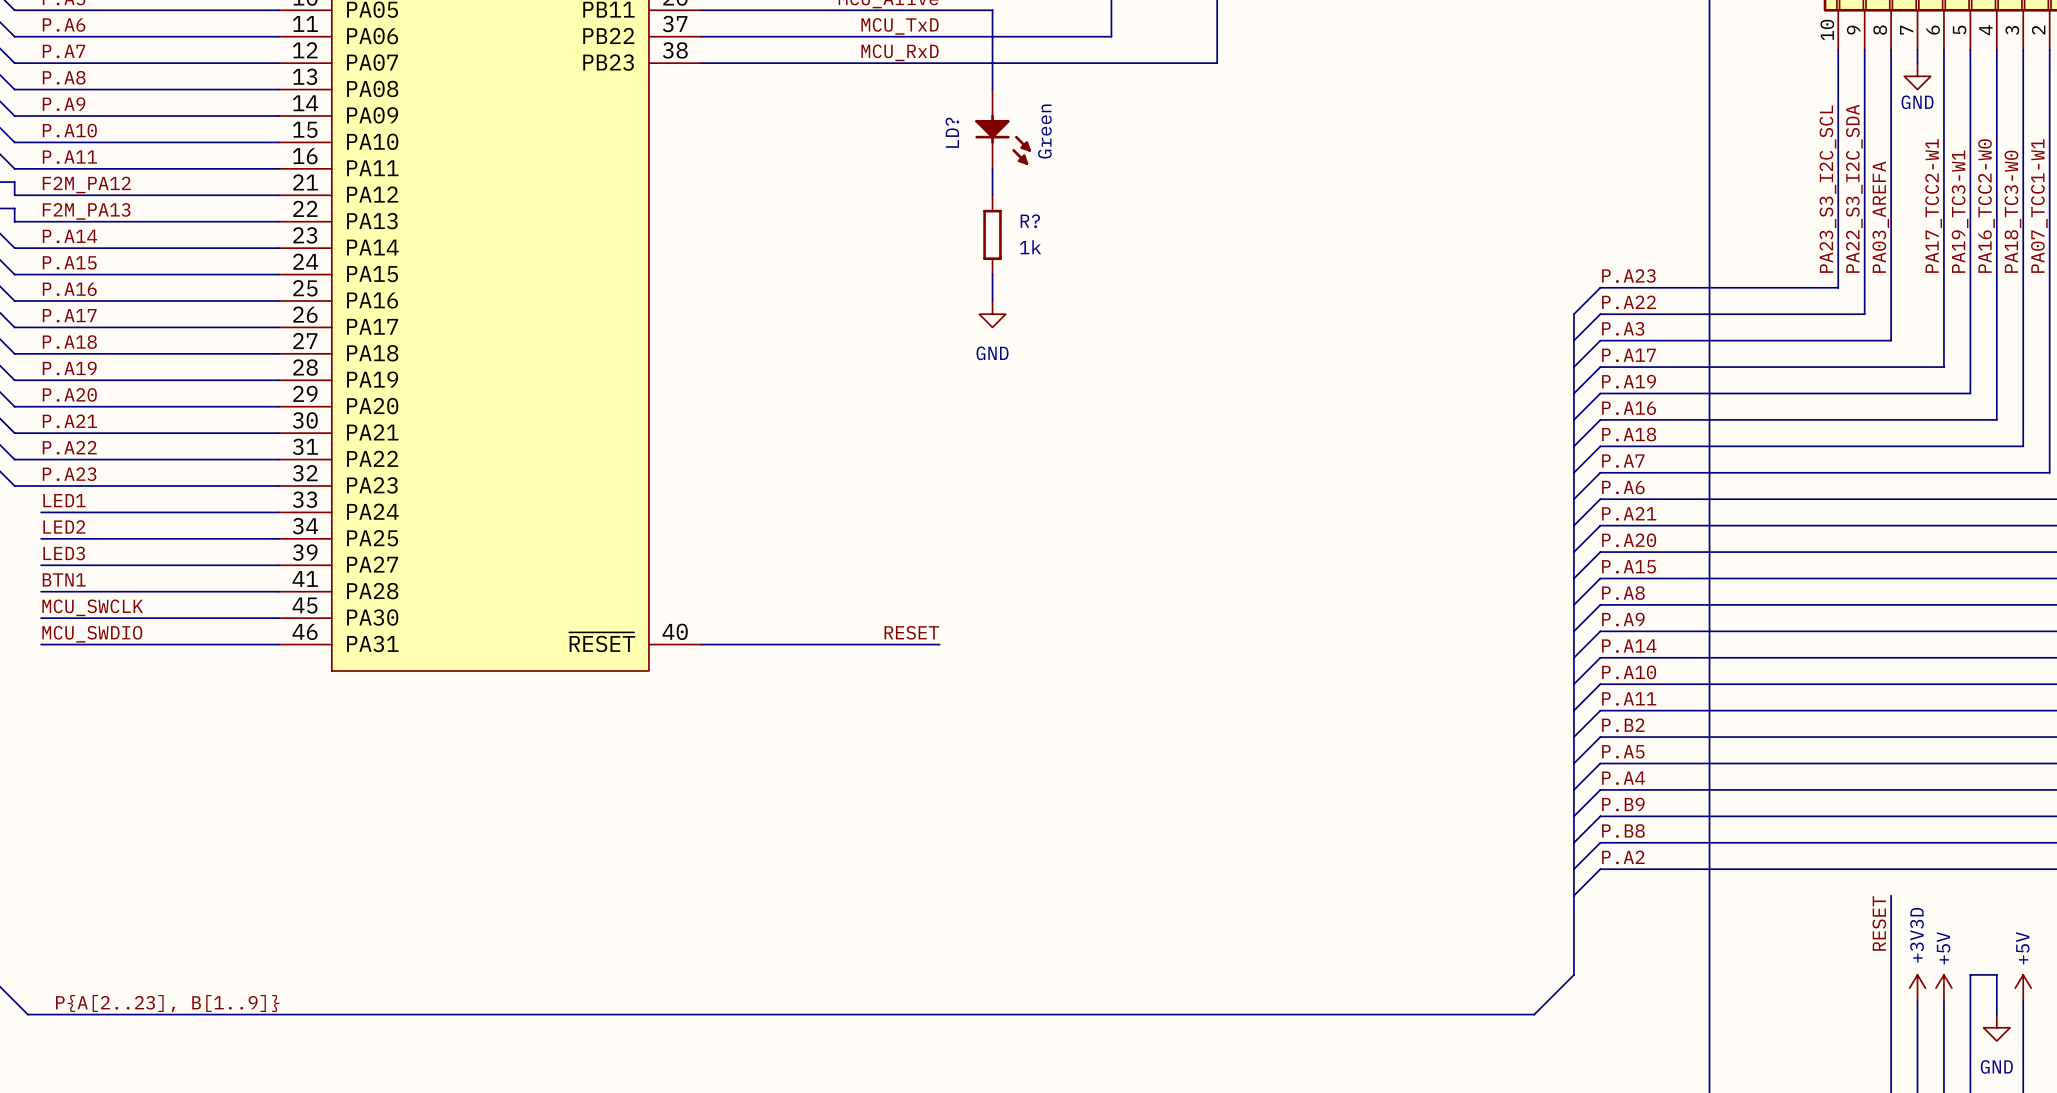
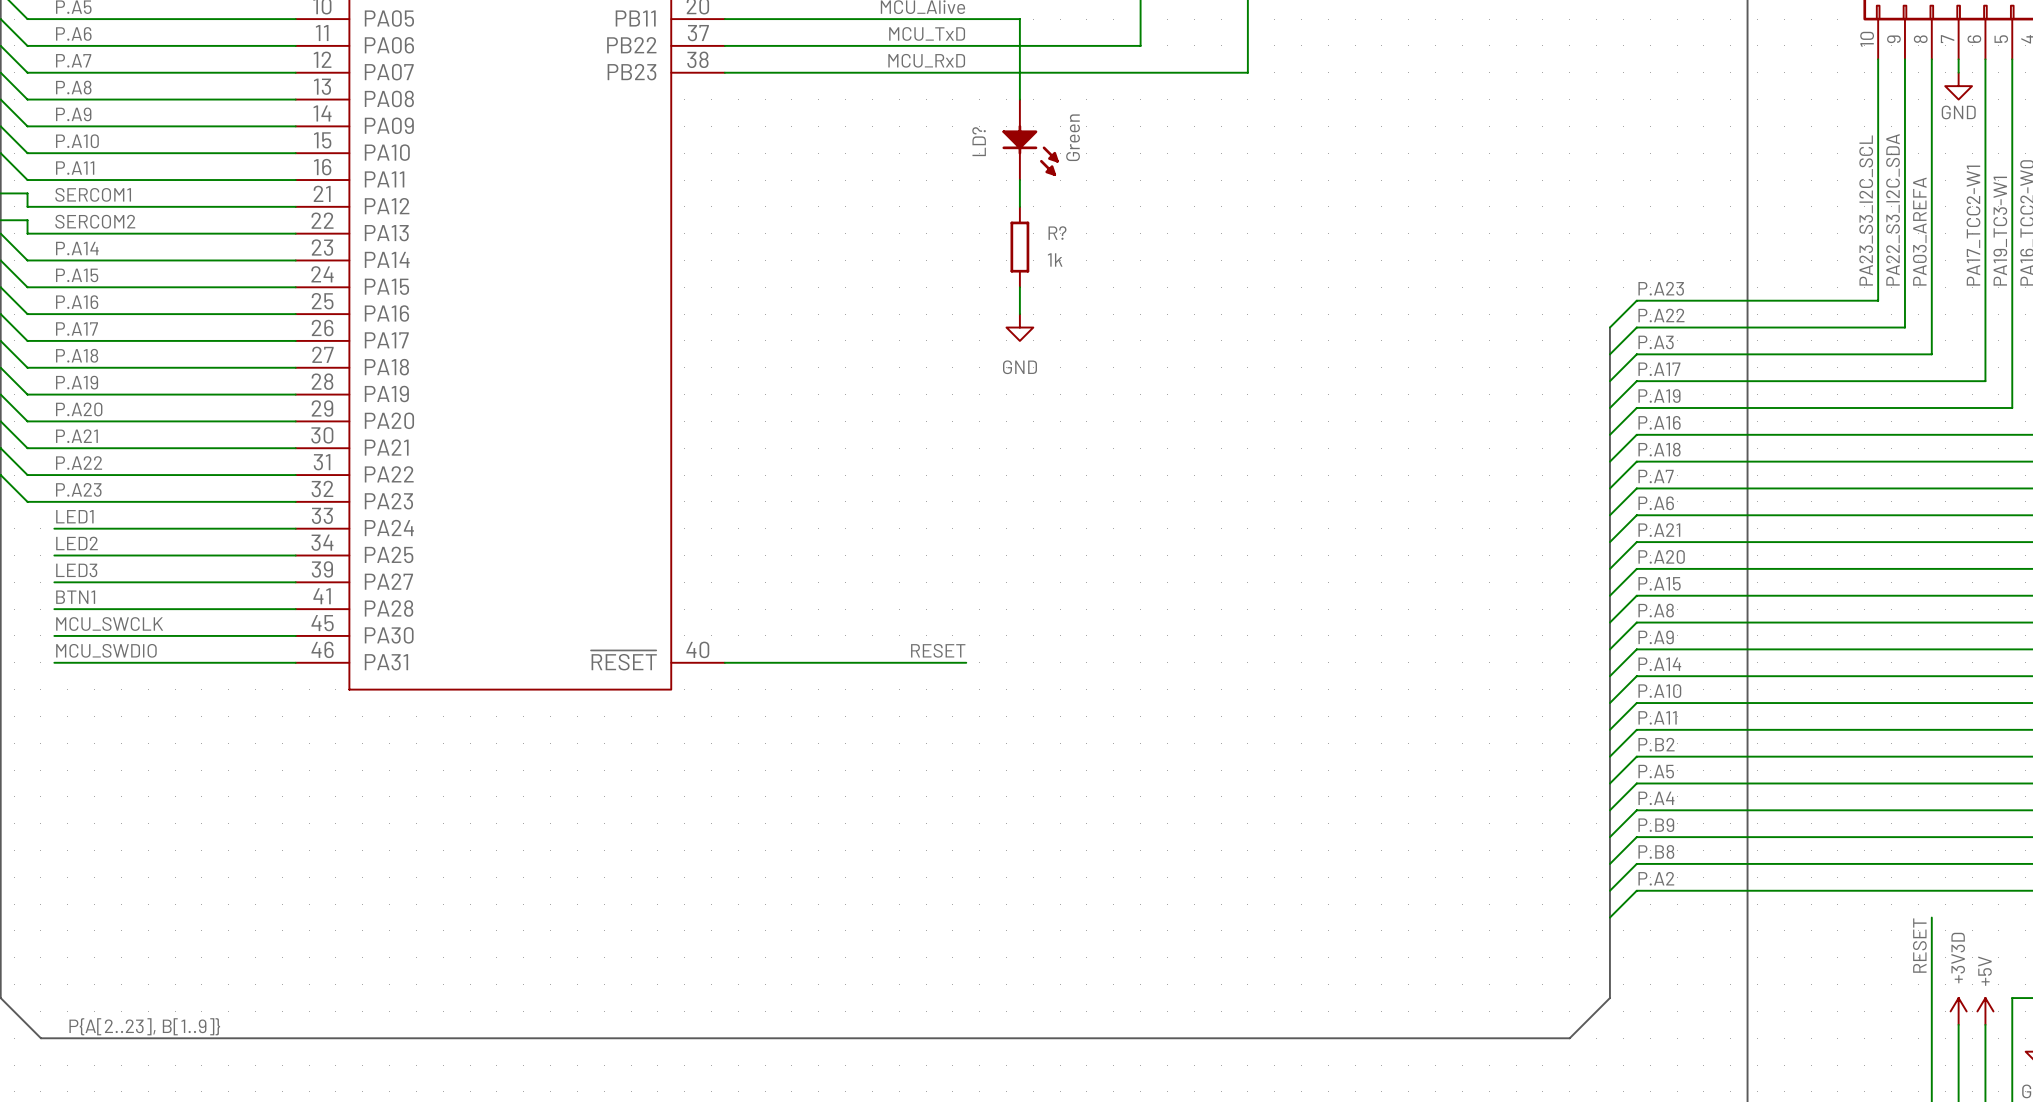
label: F2M_PA12 (86, 184) -> SERCOM1 (93, 194)
label: F2M_PA13 (86, 211) -> SERCOM2 (95, 221)

